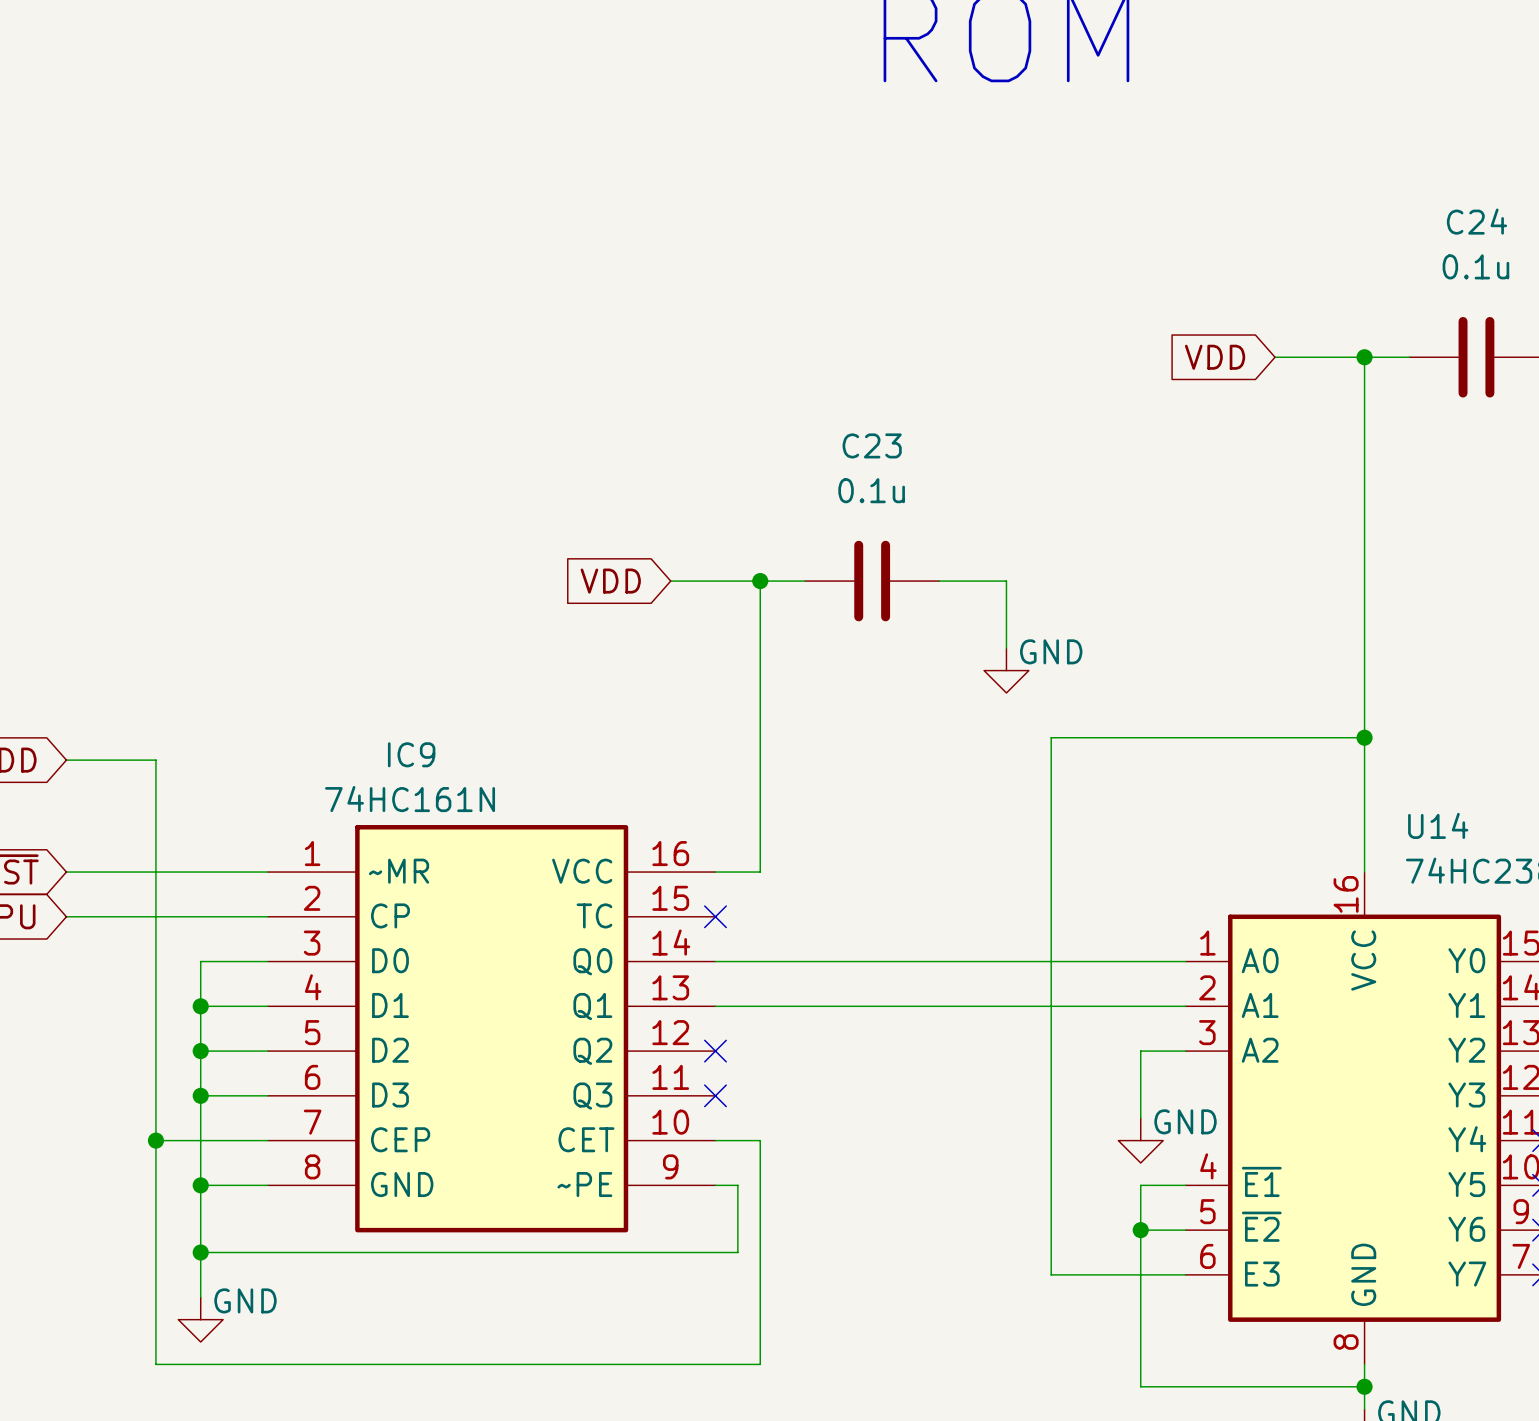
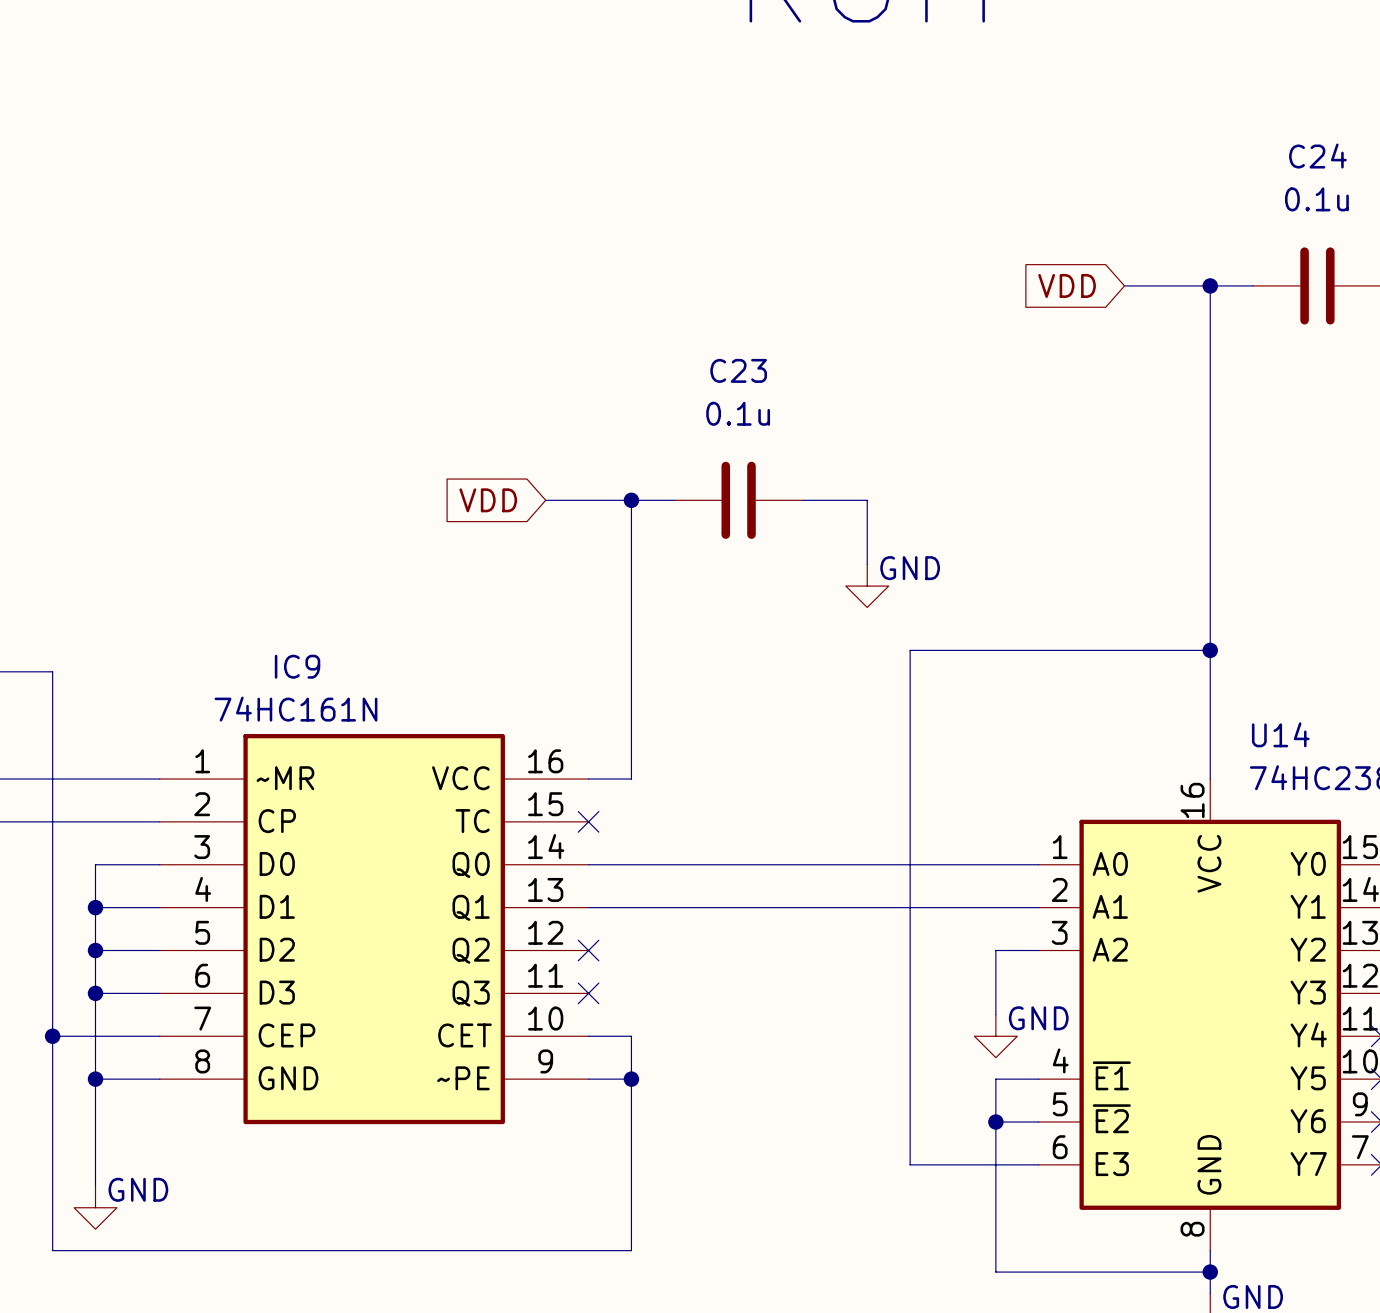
wire: (737, 1185) (737, 1252) (200, 1252) -> (610, 1079) (631, 1079)
junction: none -> (631, 1079)
junction: (200, 1252) -> none

